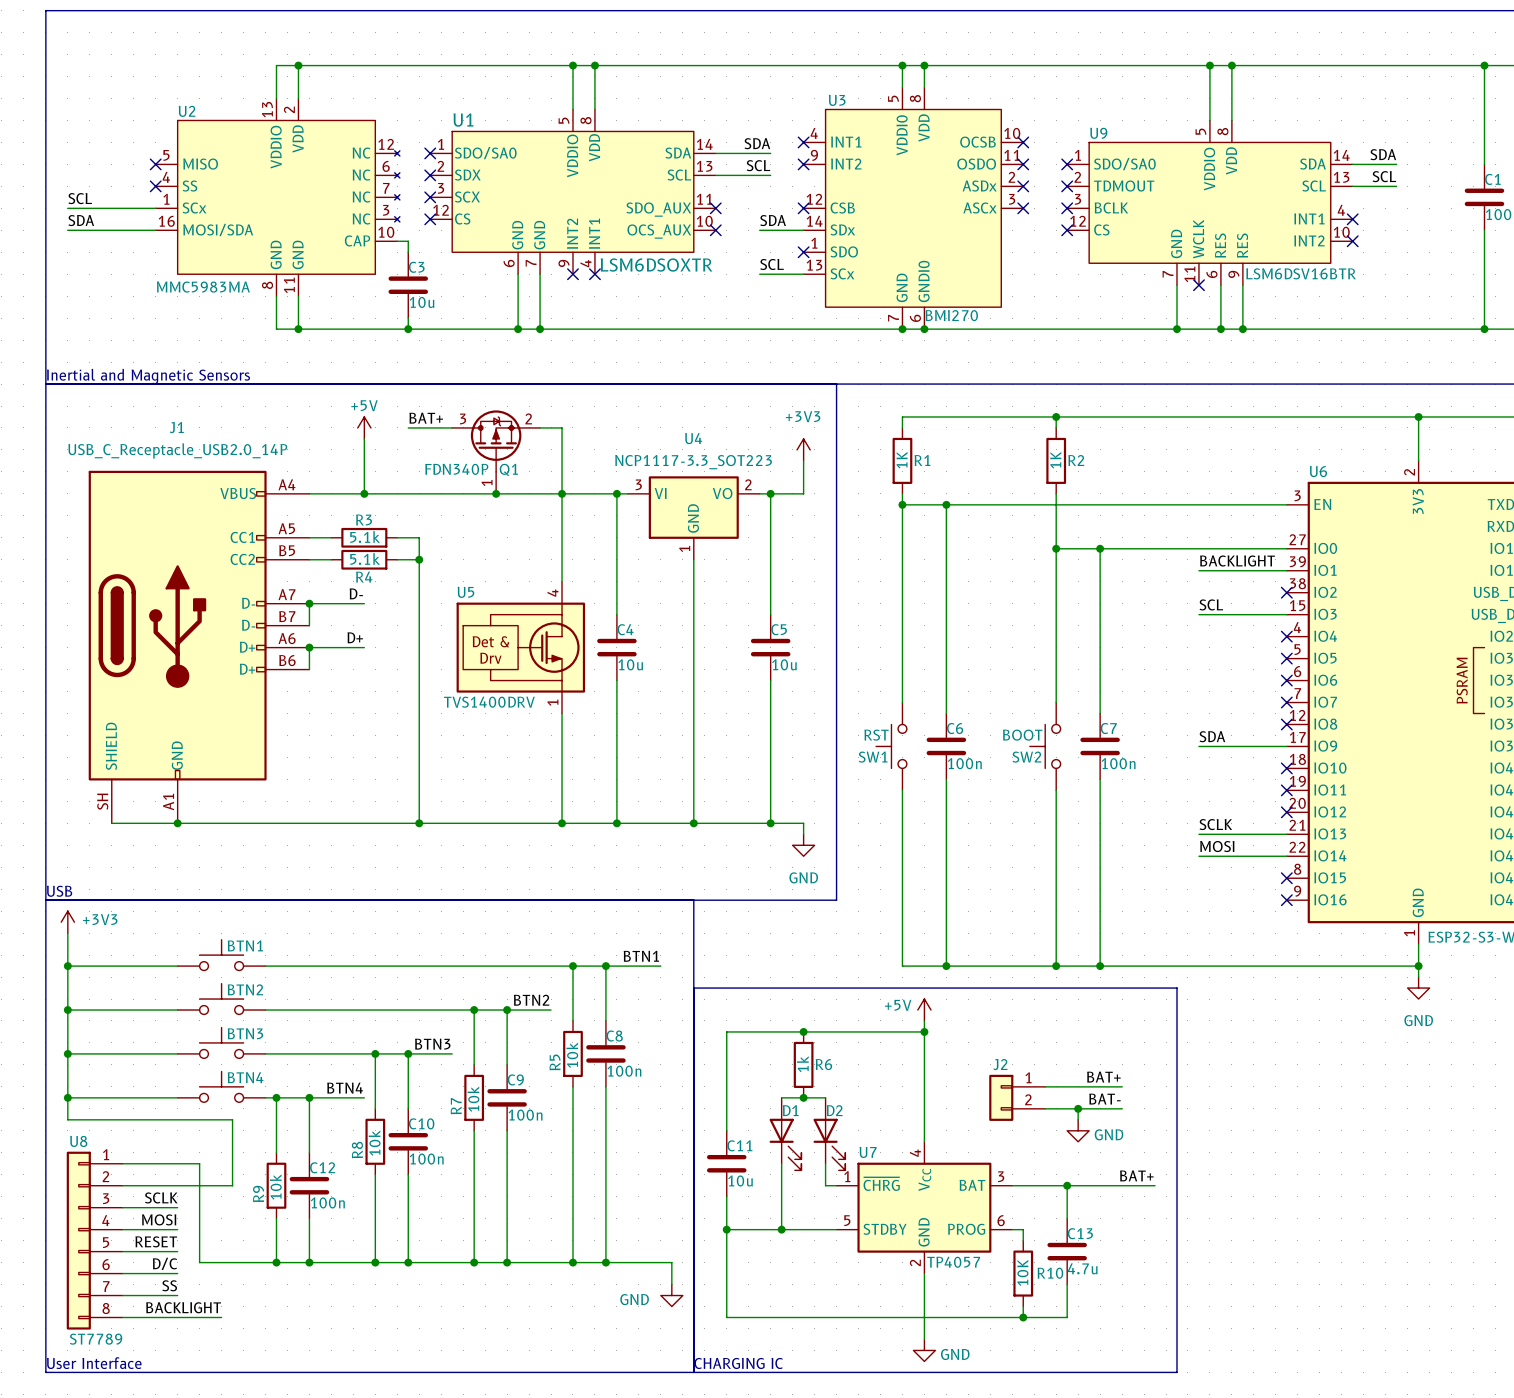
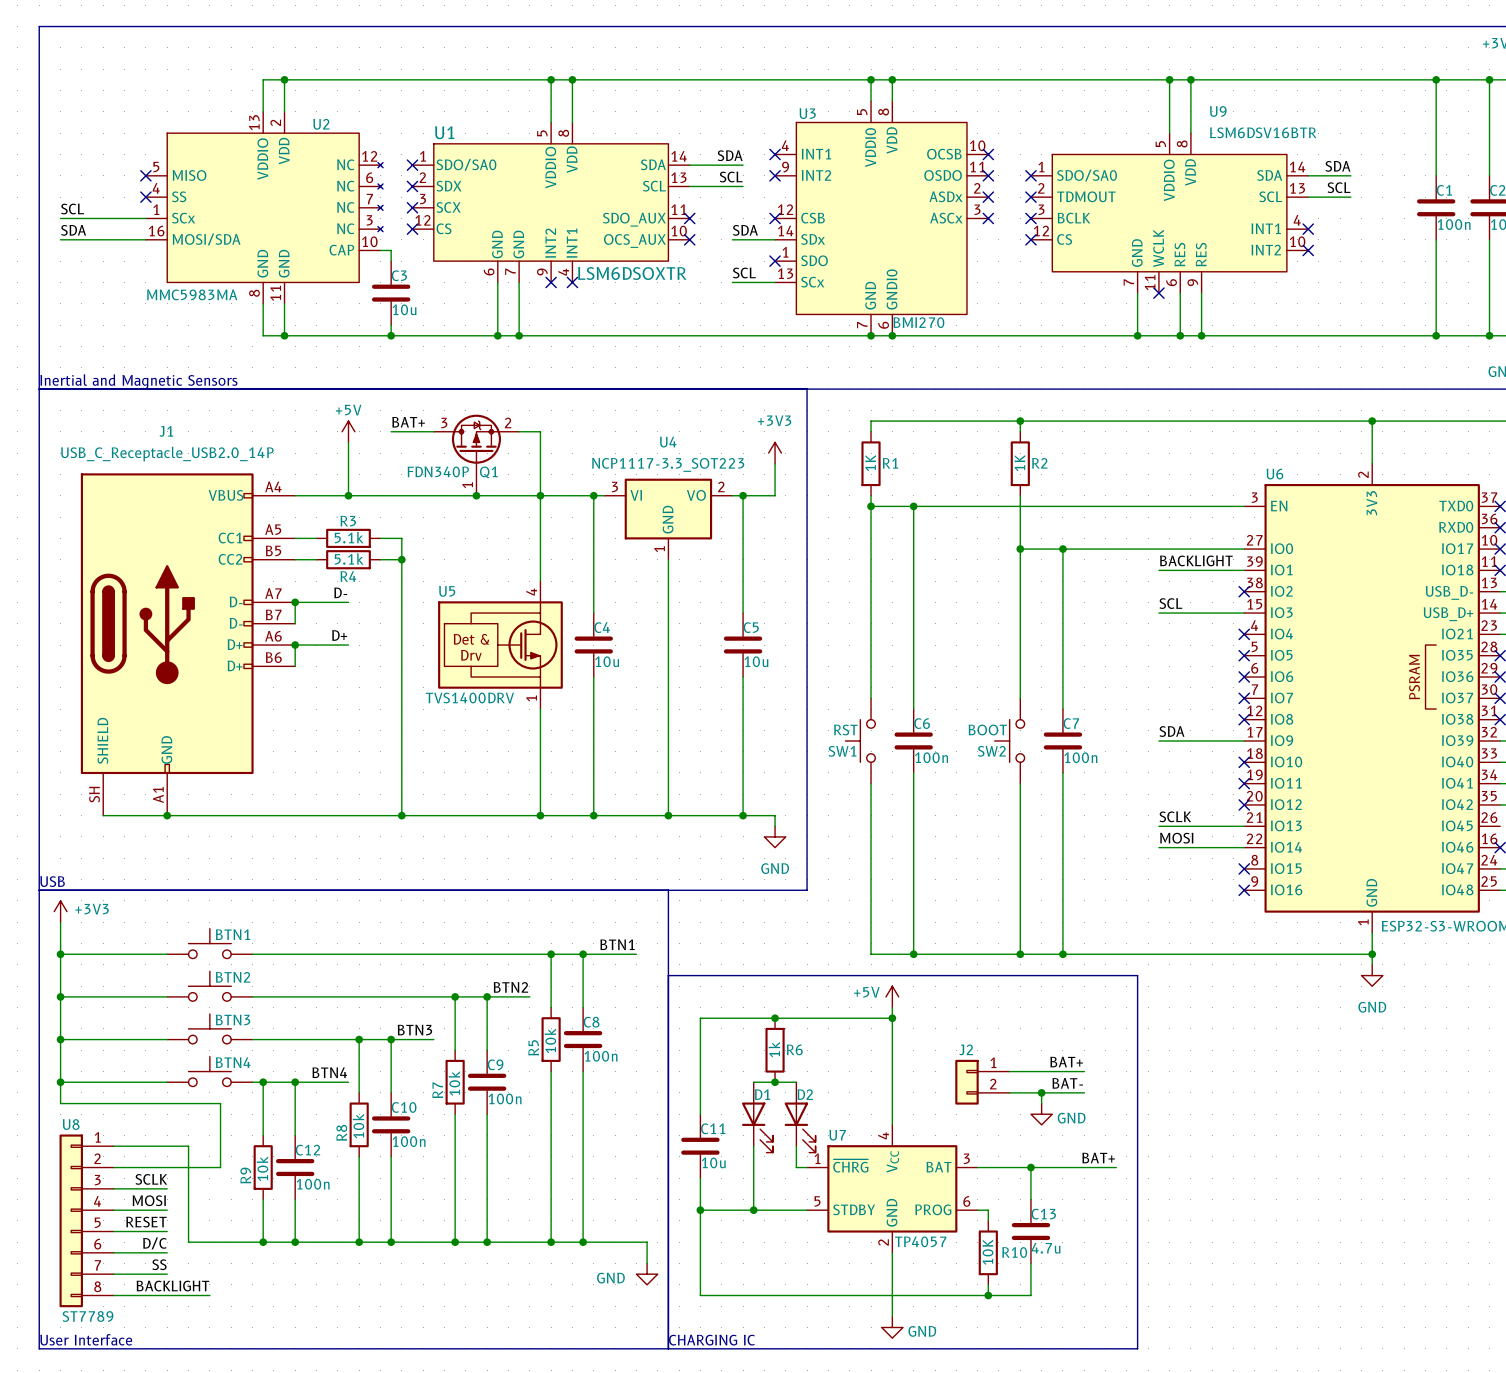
U2 name position: U2 (187, 111) -> U2 (321, 124)
U9 name position: U9 (1098, 133) -> U9 (1218, 111)
U9 value position: LSM6DSV16BTR (1301, 273) -> LSM6DSV16BTR (1263, 132)

